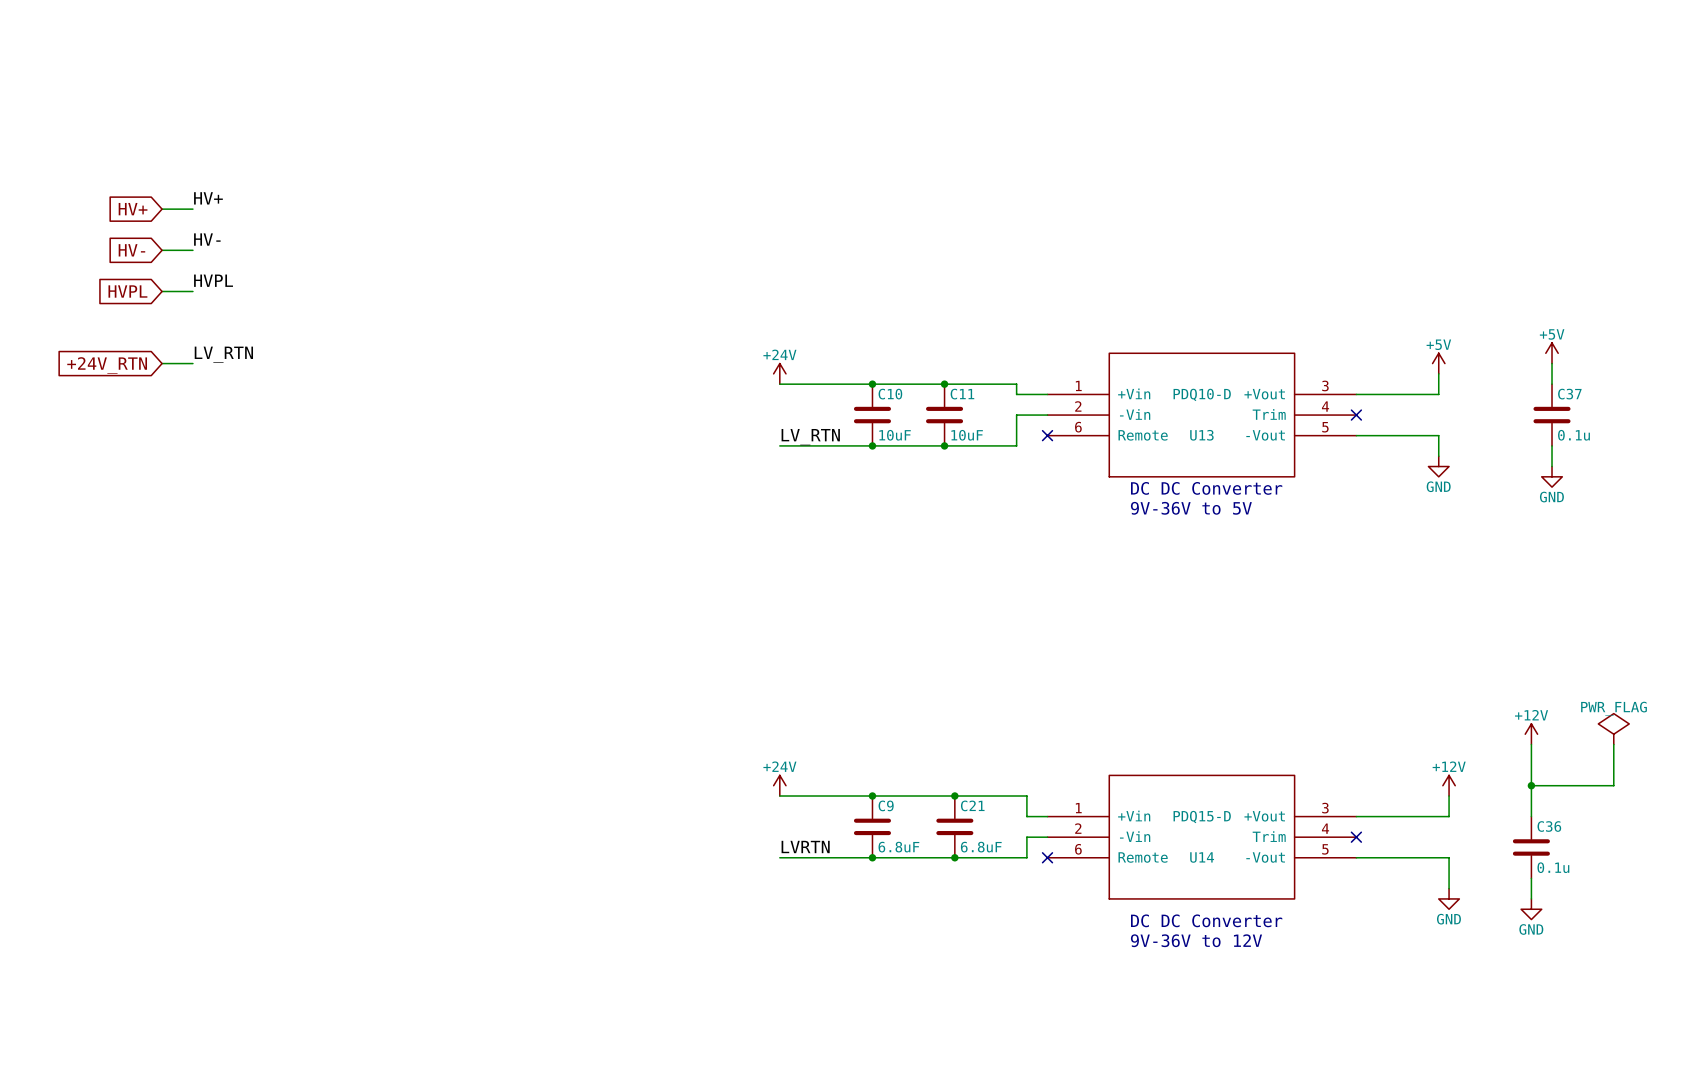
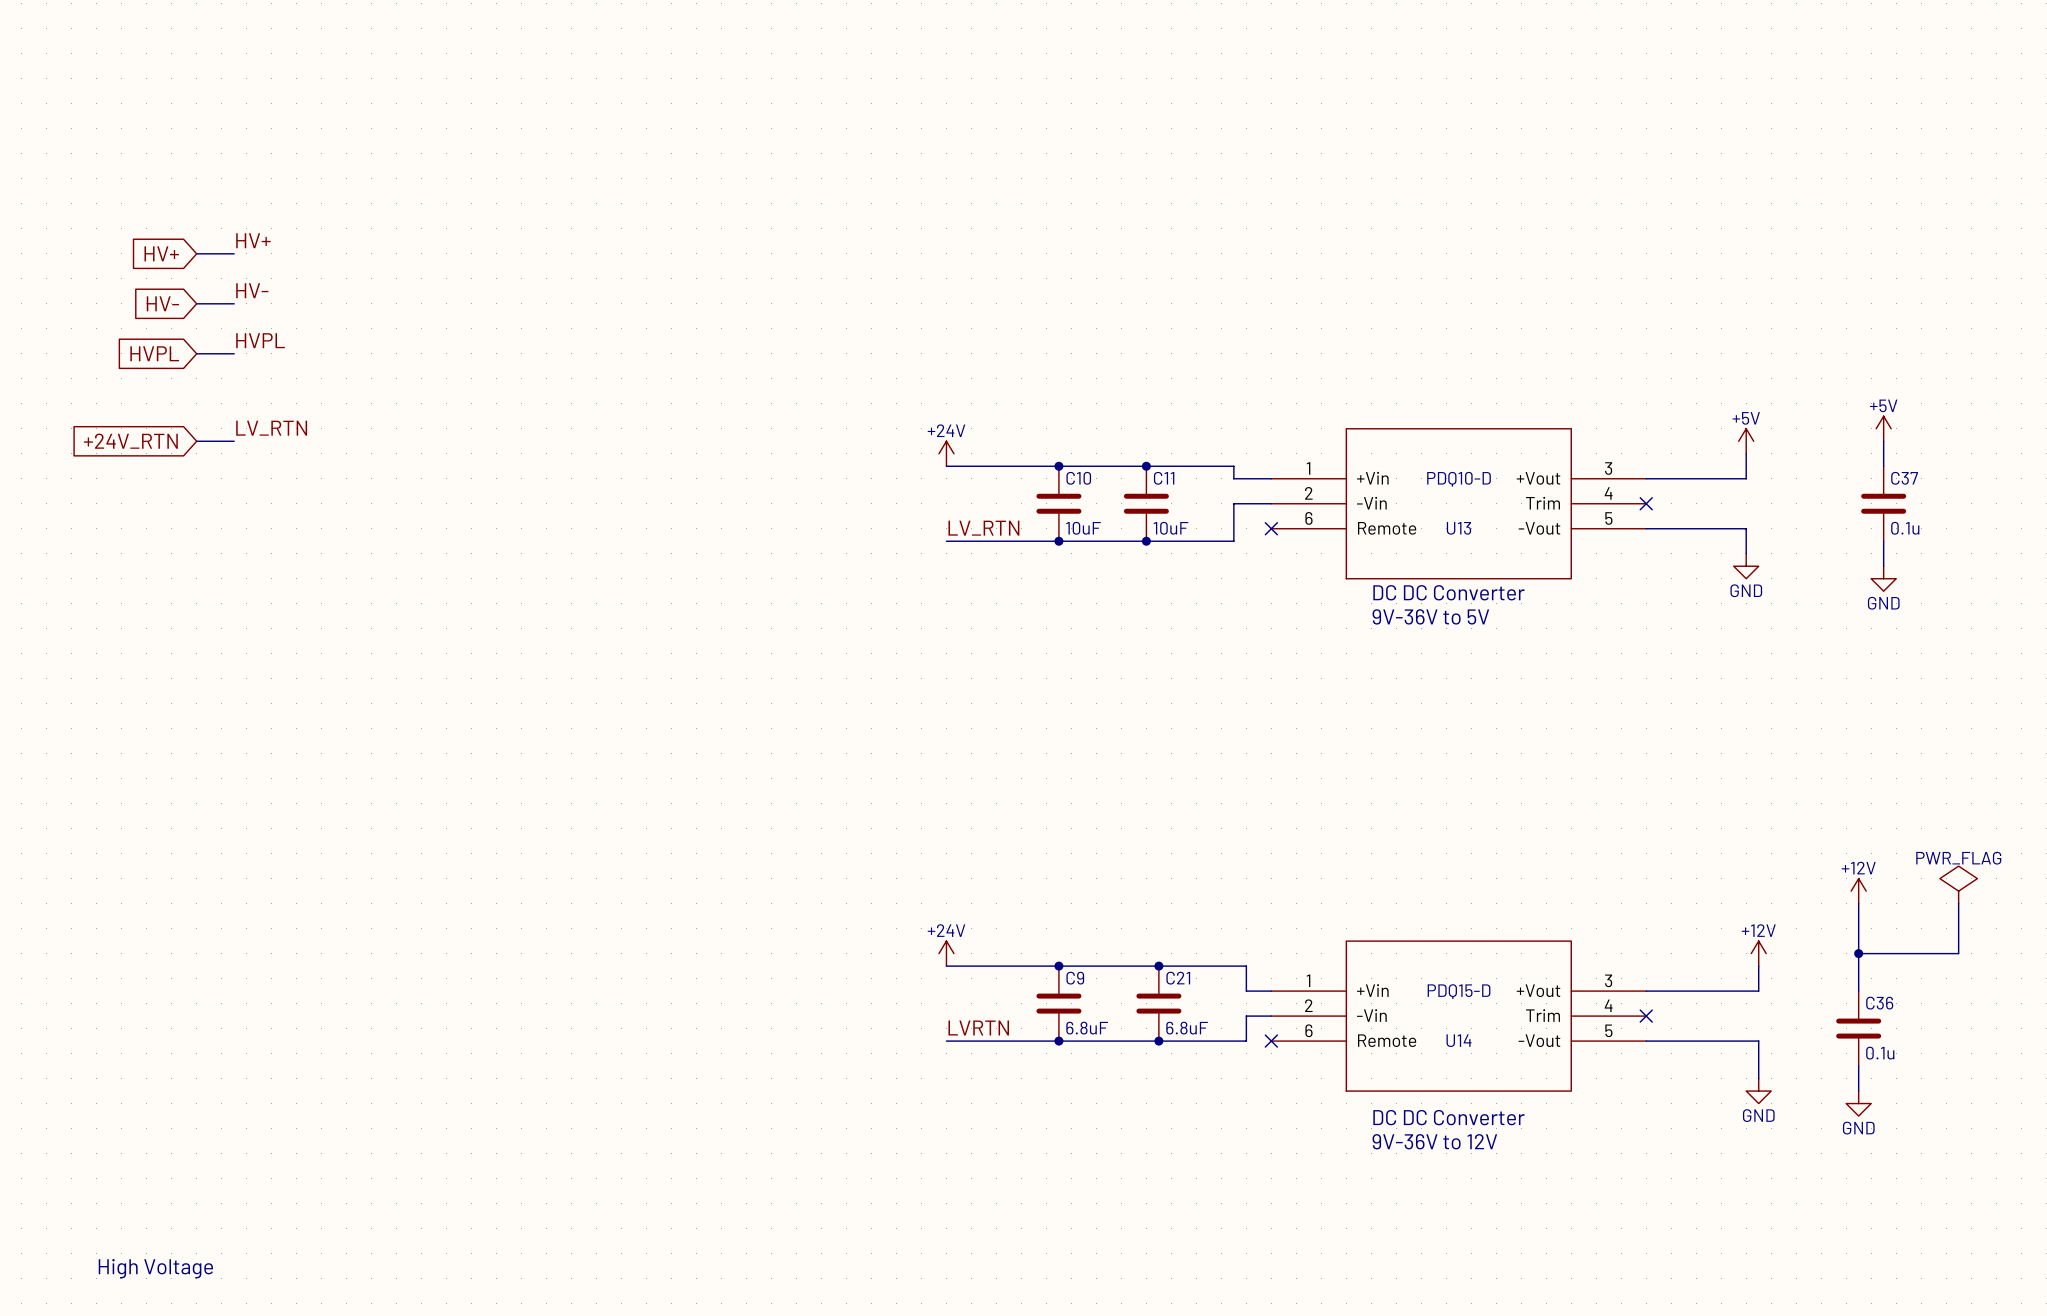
text: none -> High Voltage (155, 1268)

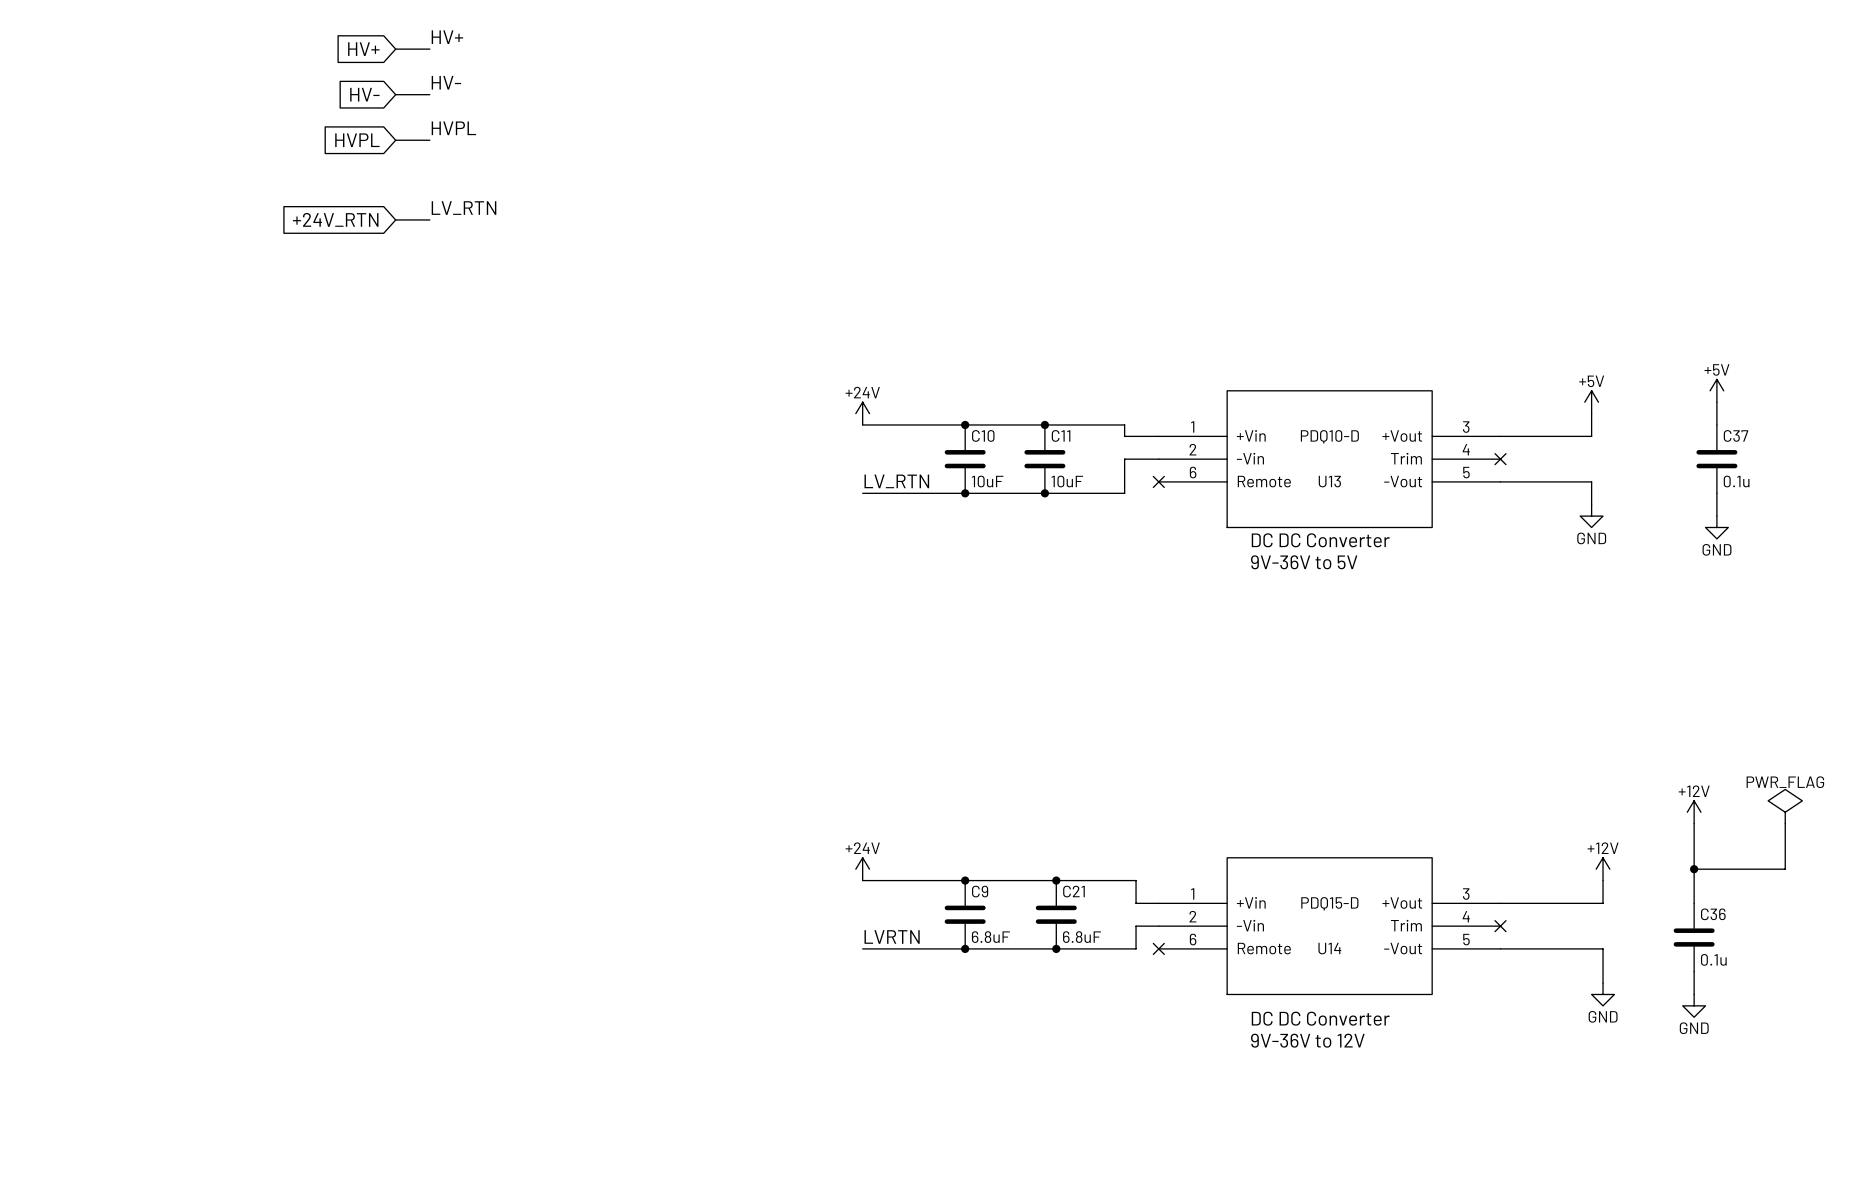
label: none -> HV+ (447, 37)
global label: none -> HV+ (363, 49)
wire: none -> (395, 49) (429, 49)
label: none -> HV- (446, 82)
global label: none -> HV- (364, 94)
wire: none -> (395, 94) (429, 94)
label: none -> HVPL (453, 128)
global label: none -> HVPL (357, 140)
wire: none -> (395, 140) (429, 140)
label: none -> LV_RTN (464, 208)
label: HV+ (253, 240) -> none
global label: none -> +24V_RTN (335, 219)
global label: HV+ (161, 253) -> none
wire: (196, 253) (234, 253) -> (395, 219) (429, 219)
label: HV- (252, 290) -> none
global label: HV- (162, 303) -> none
wire: (196, 303) (234, 303) -> none
label: HVPL (260, 340) -> none
global label: HVPL (154, 353) -> none
wire: (196, 353) (234, 353) -> none
label: LV_RTN (271, 428) -> none
global label: +24V_RTN (130, 441) -> none
wire: (196, 441) (234, 441) -> none
text: High Voltage (155, 1268) -> none

